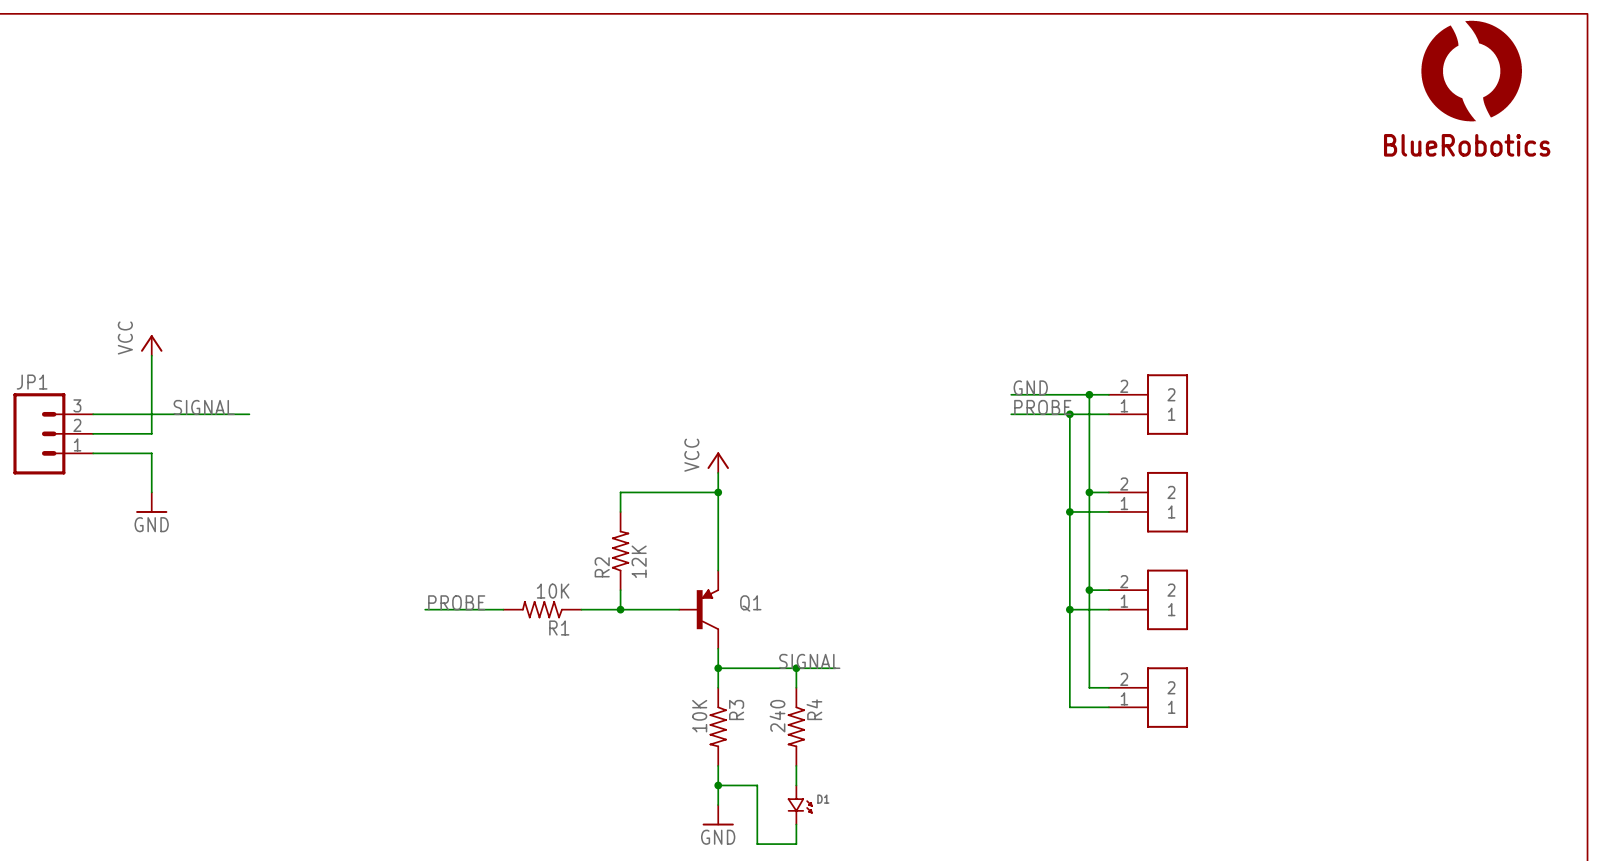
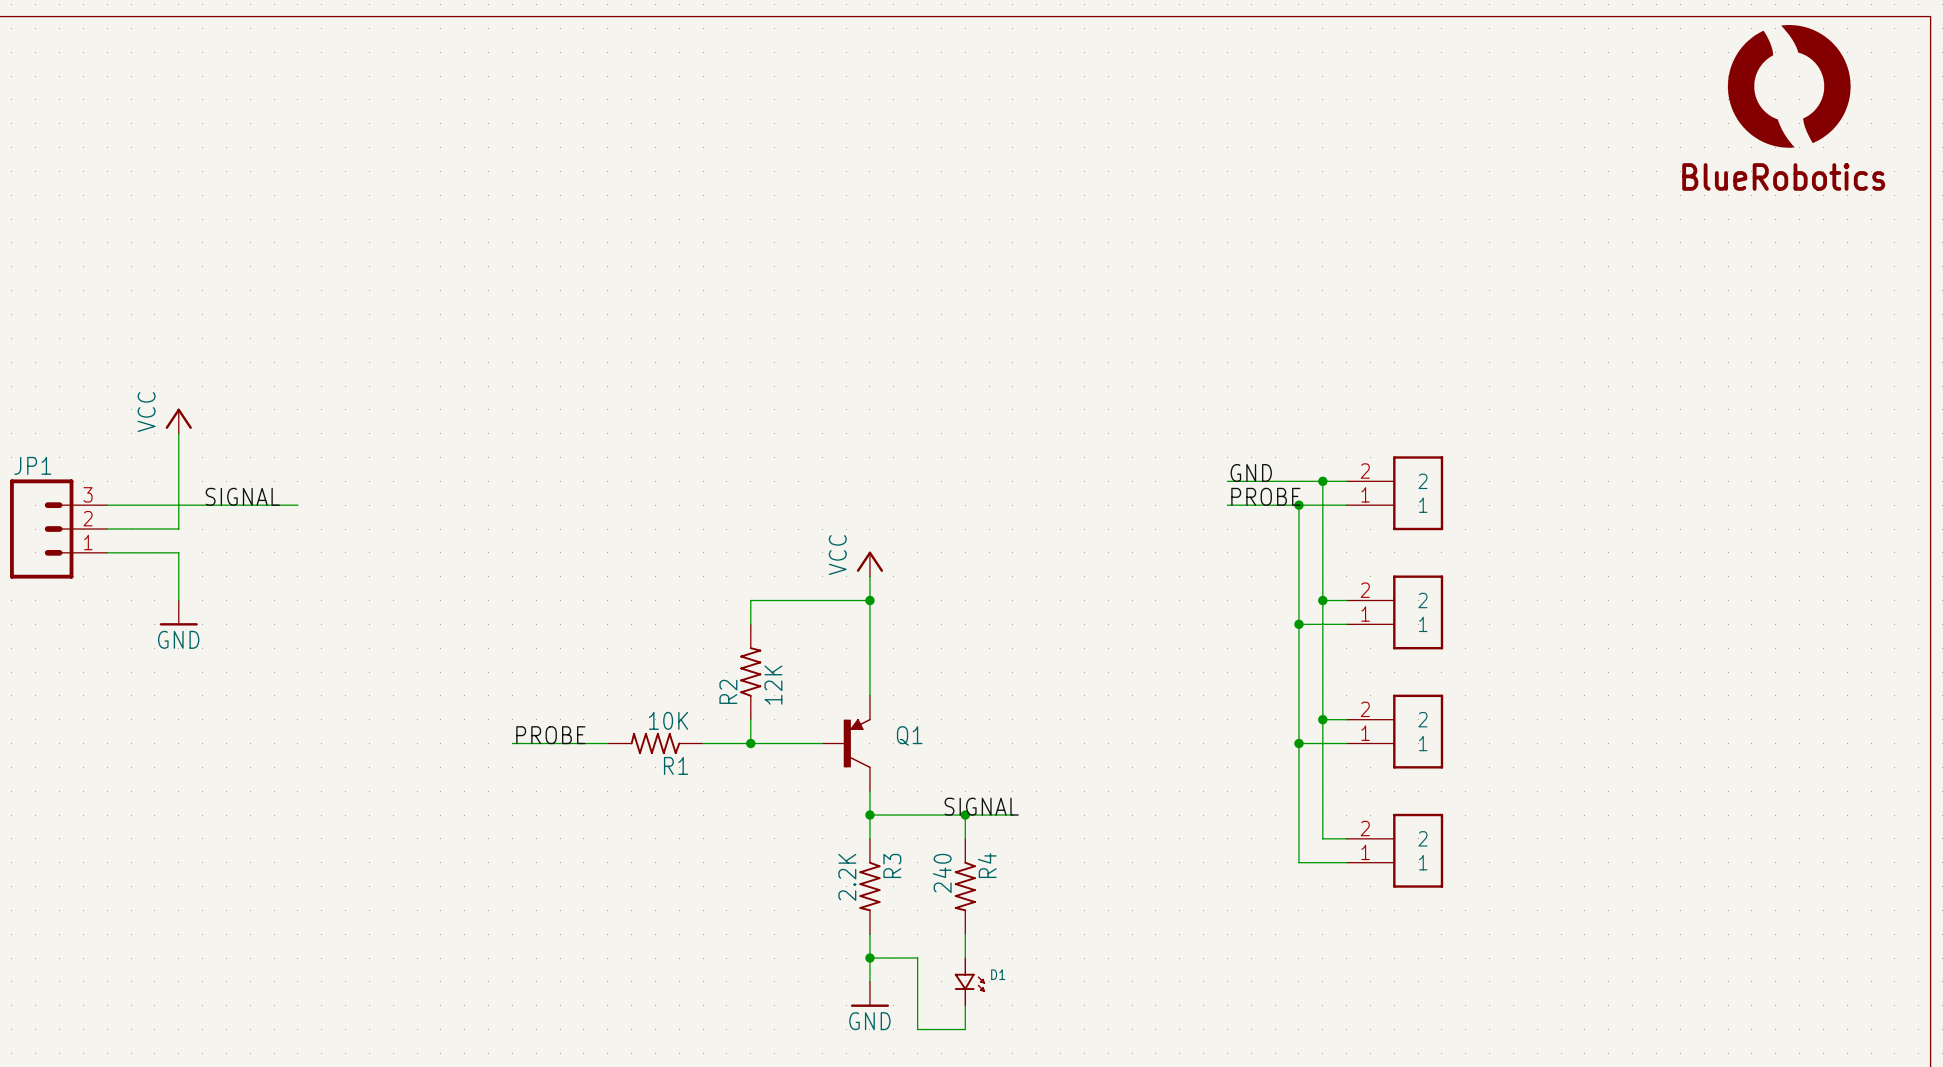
R3 value: 10K (699, 716) -> 2.2K (847, 877)

